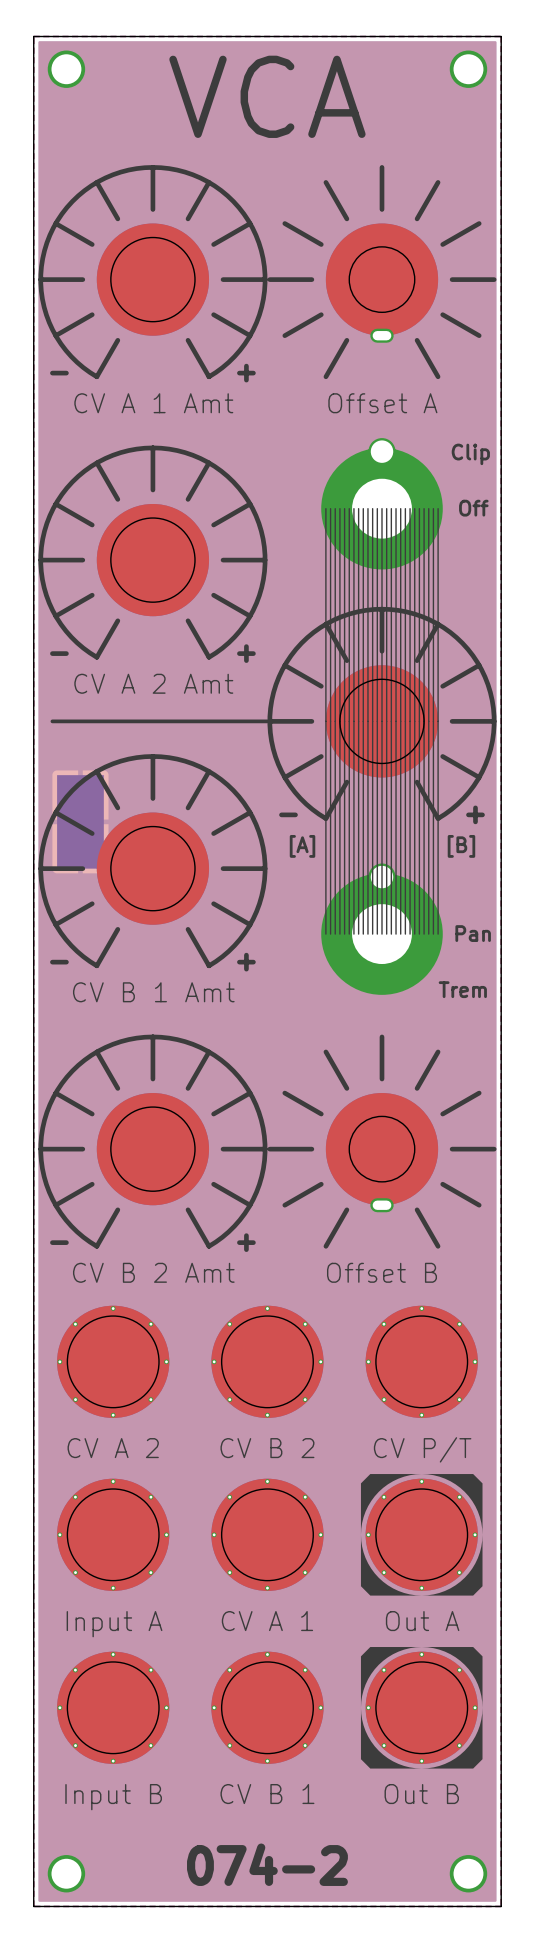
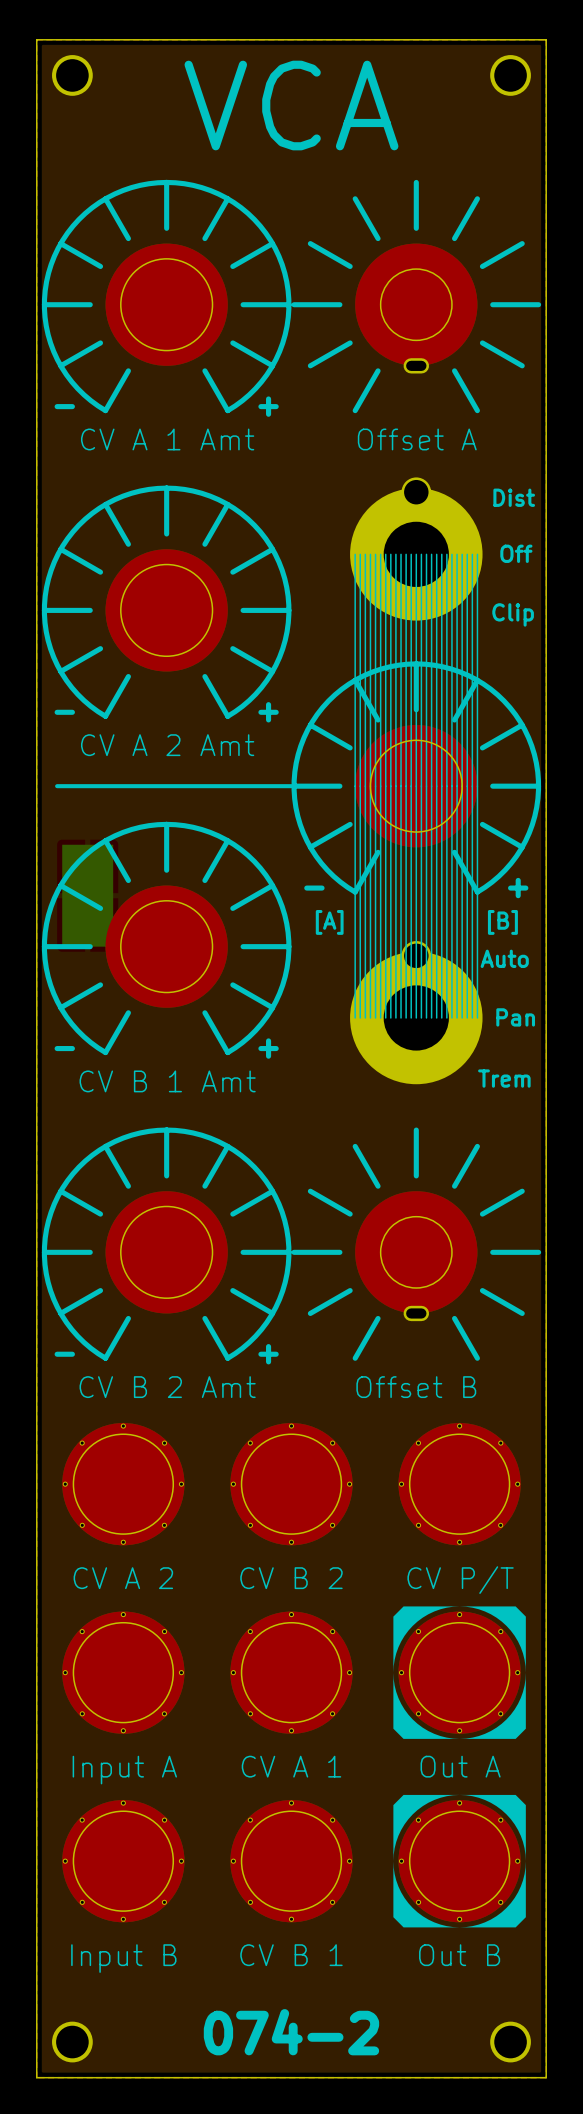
text: Clip (470, 454) -> Dist (514, 497)
text: none -> Clip (513, 614)
text: none -> Auto (504, 958)

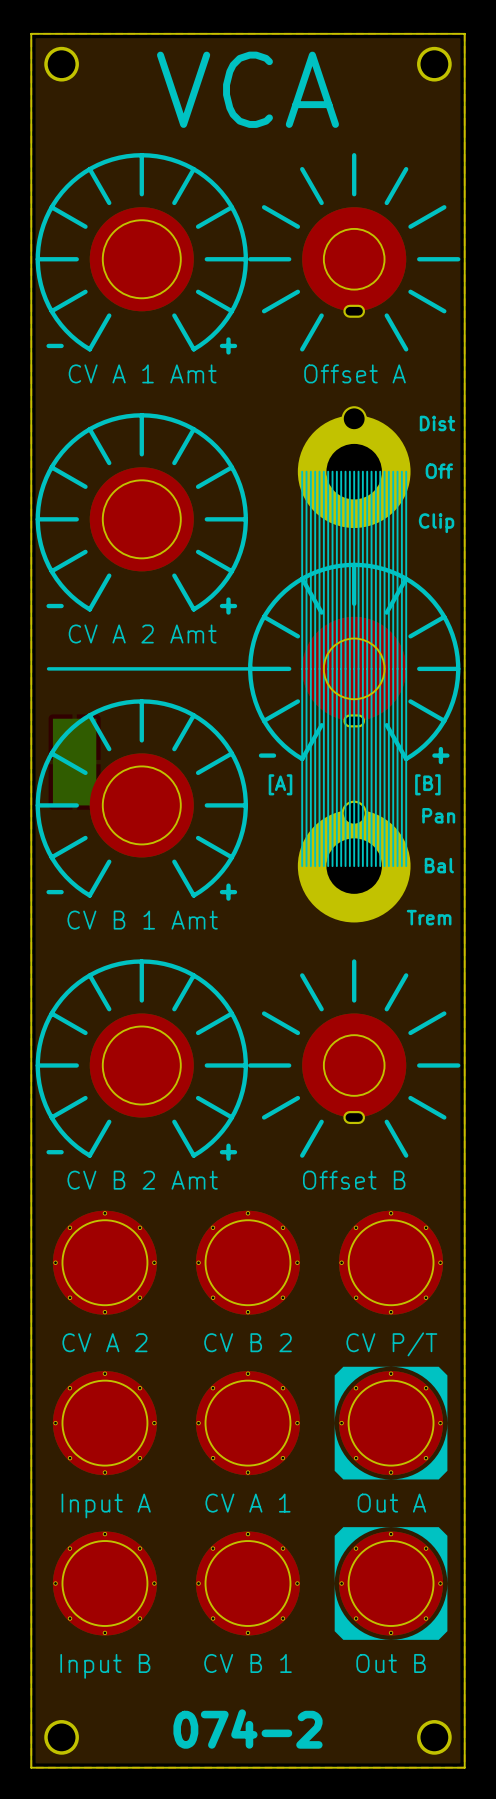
part footprint: [291, 661, 542, 899] -> [247, 562, 461, 765]
text: Auto (504, 958) -> Pan (438, 815)
text: Pan (515, 1017) -> Bal (439, 865)

